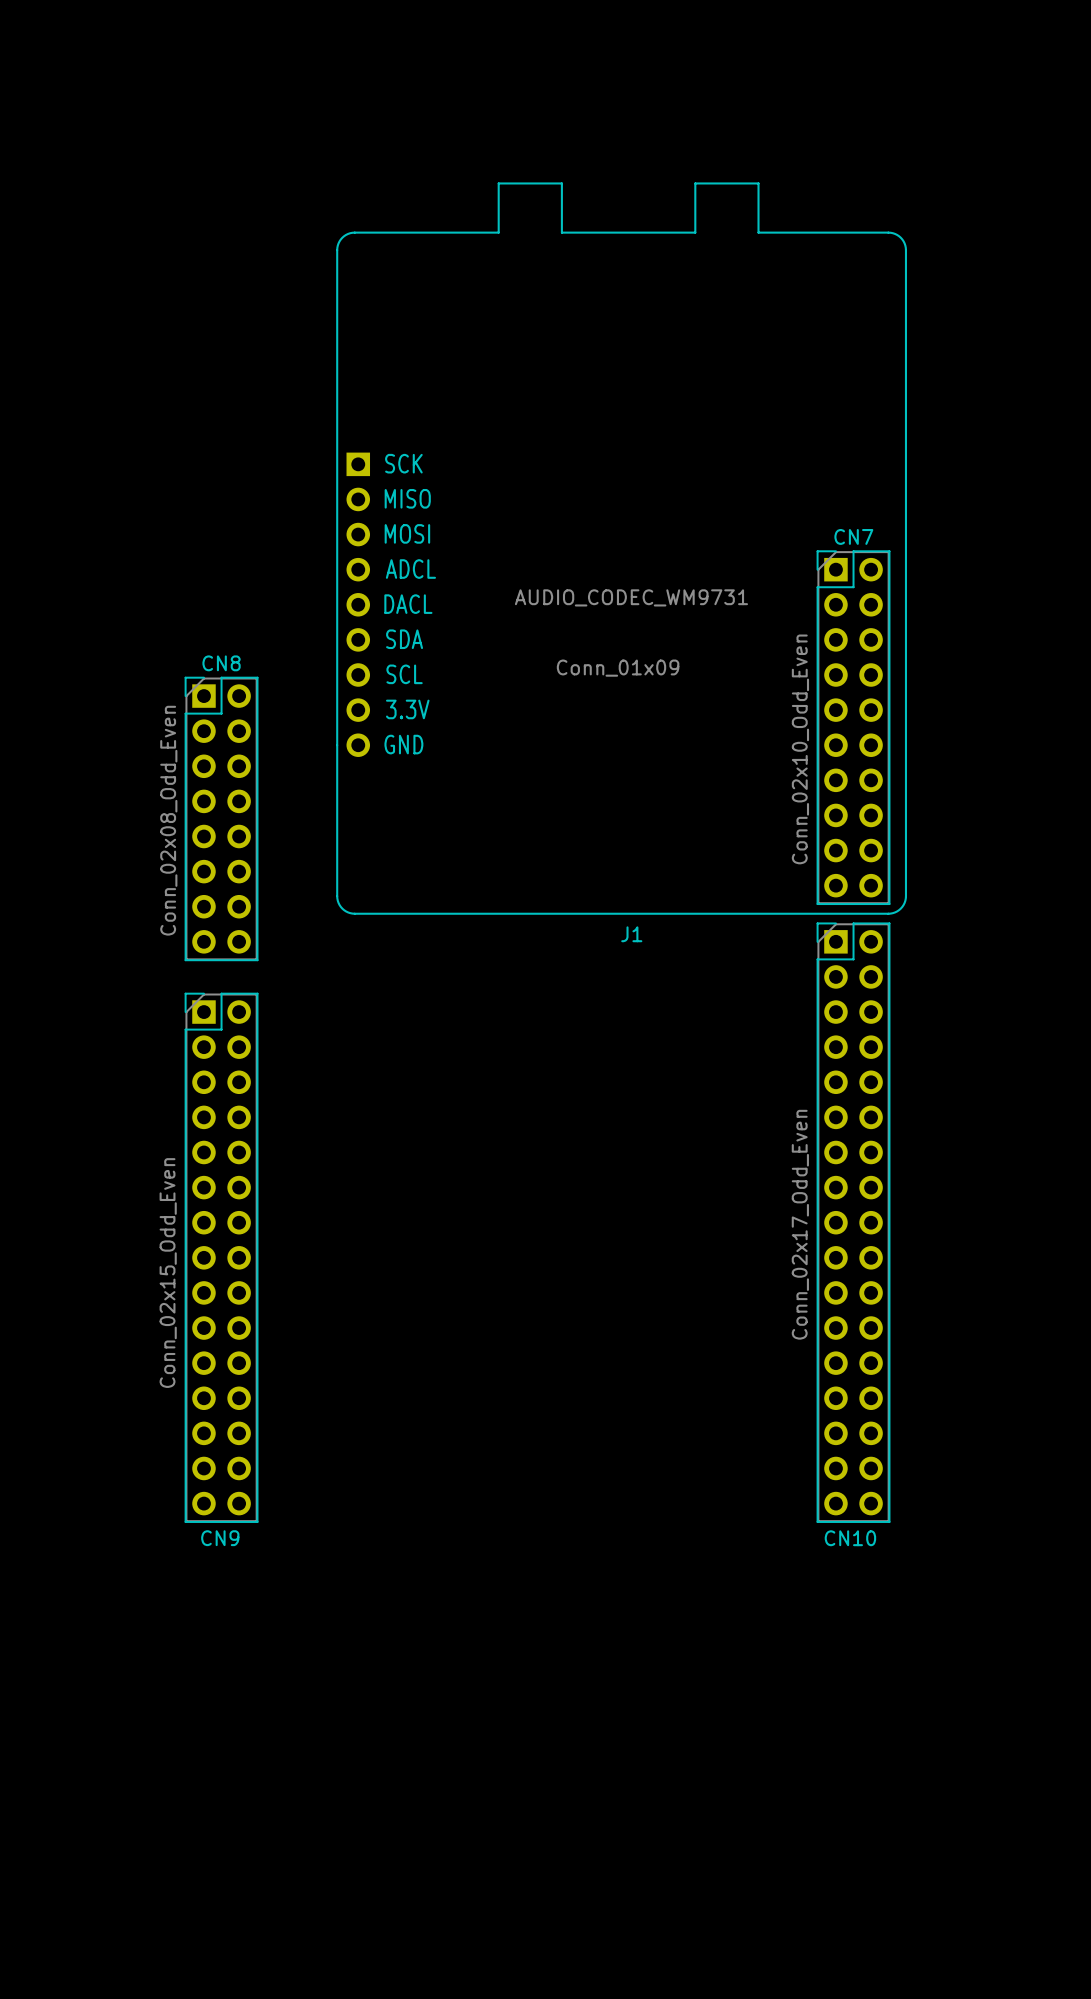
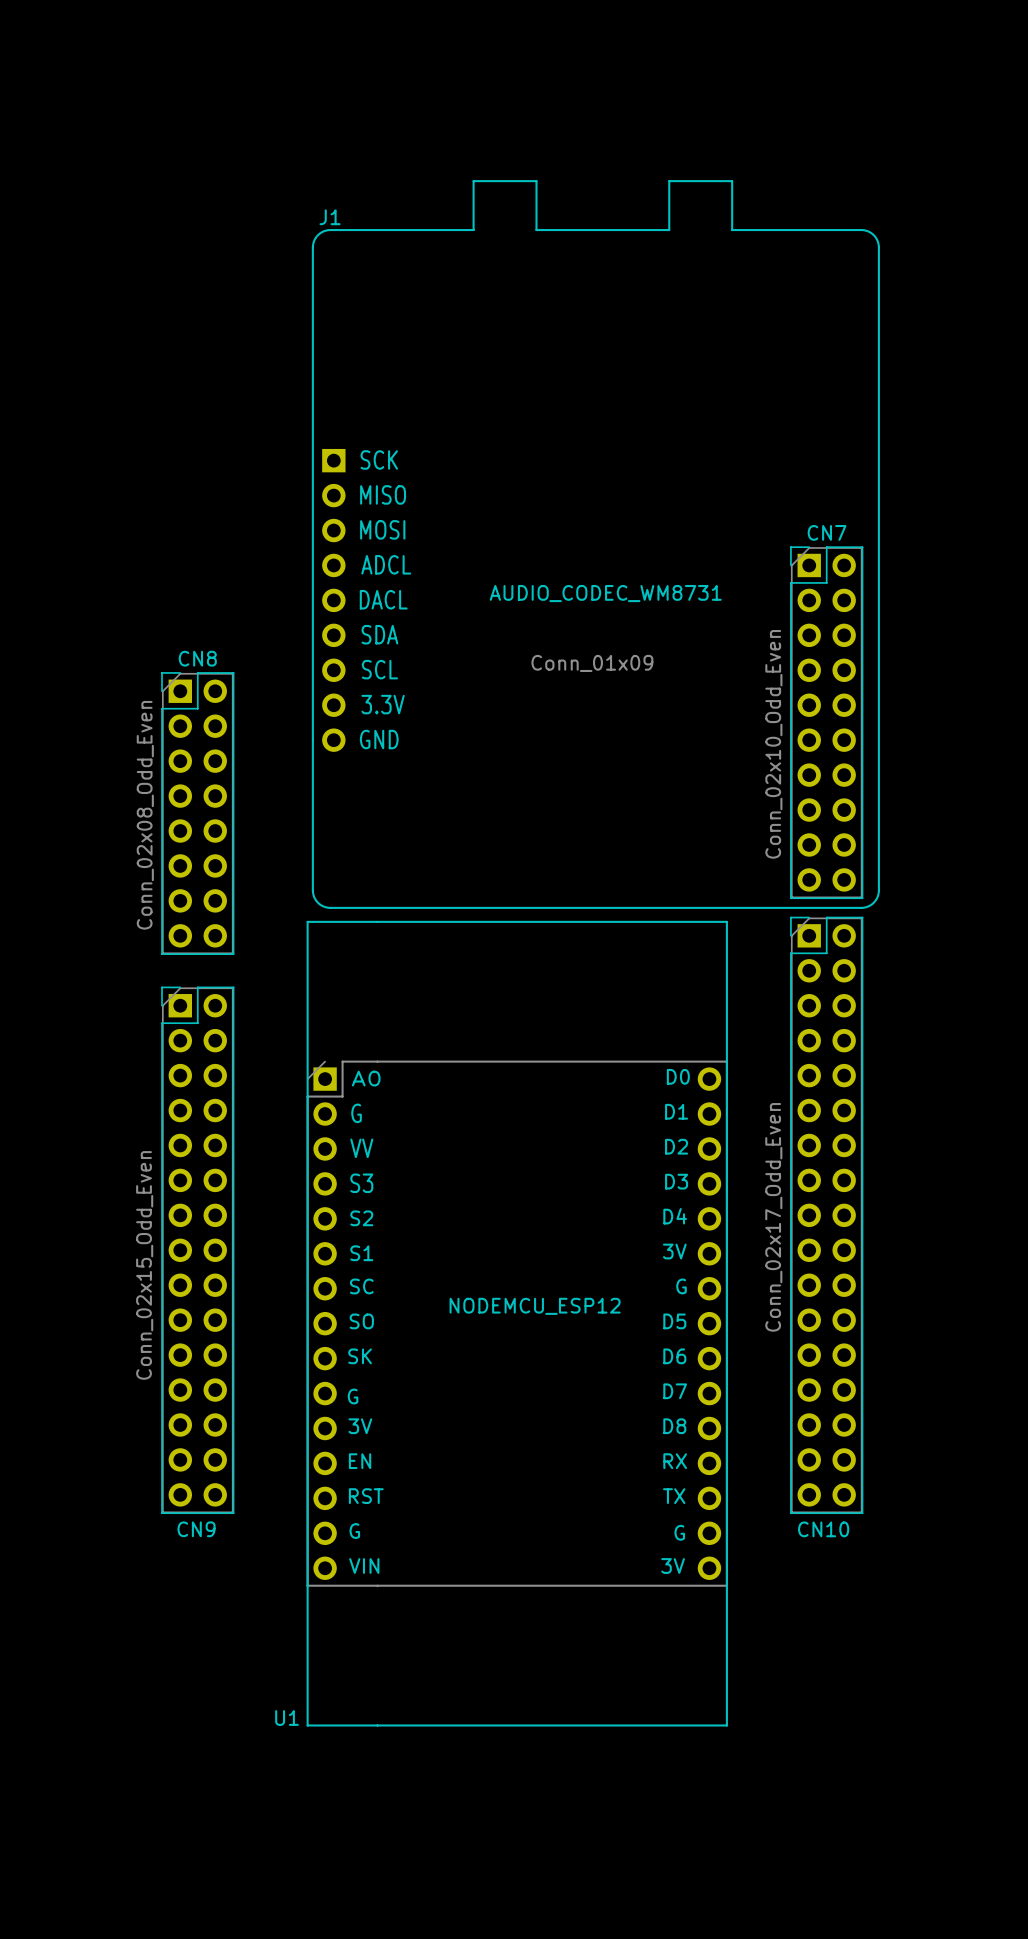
J1 text: AUDIO_CODEC_WM9731 (631, 597) -> AUDIO_CODEC_WM8731 (605, 593)
J1 name position: J1 (631, 934) -> J1 (330, 217)
U1: none -> NODEMCU_ESP12 (517, 1323)

